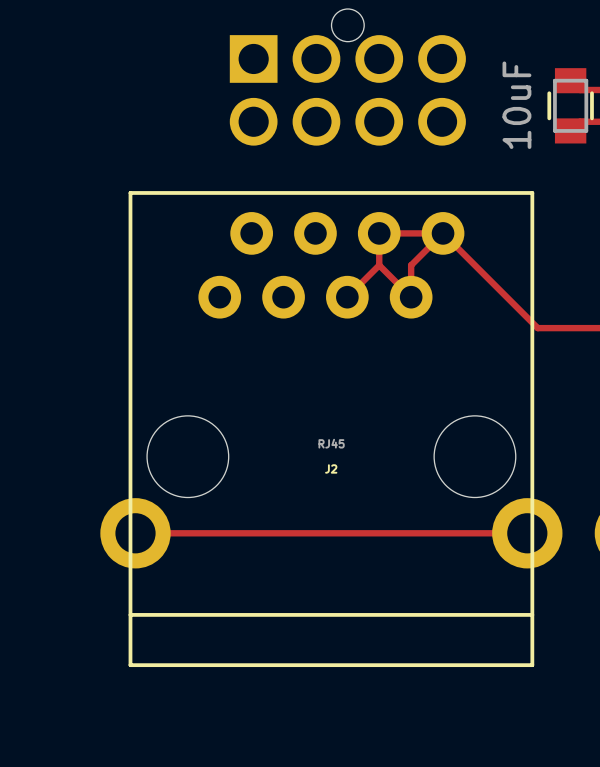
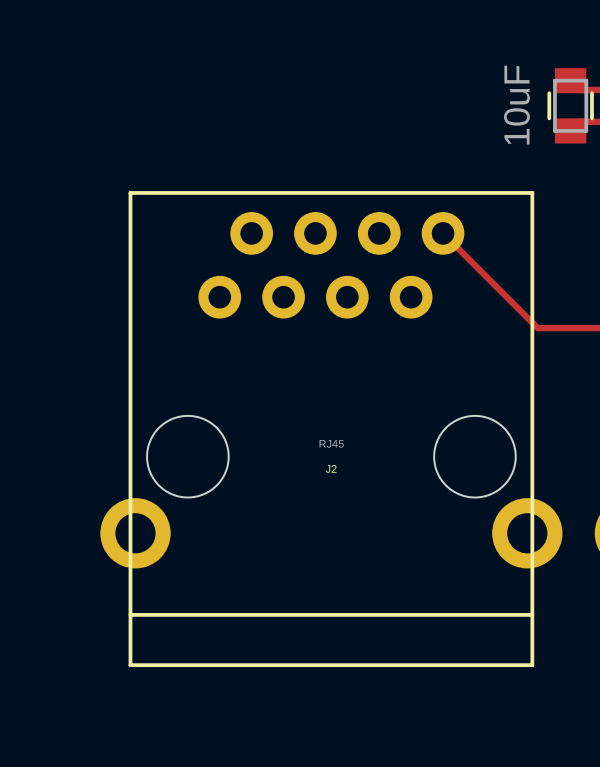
part: (347, 77) -> none
track: (379, 265) (411, 297) (411, 265) (443, 233) (379, 233) (379, 265) -> none
track: (379, 265) (347, 297) -> none
track: (135, 533) (527, 533) -> none

